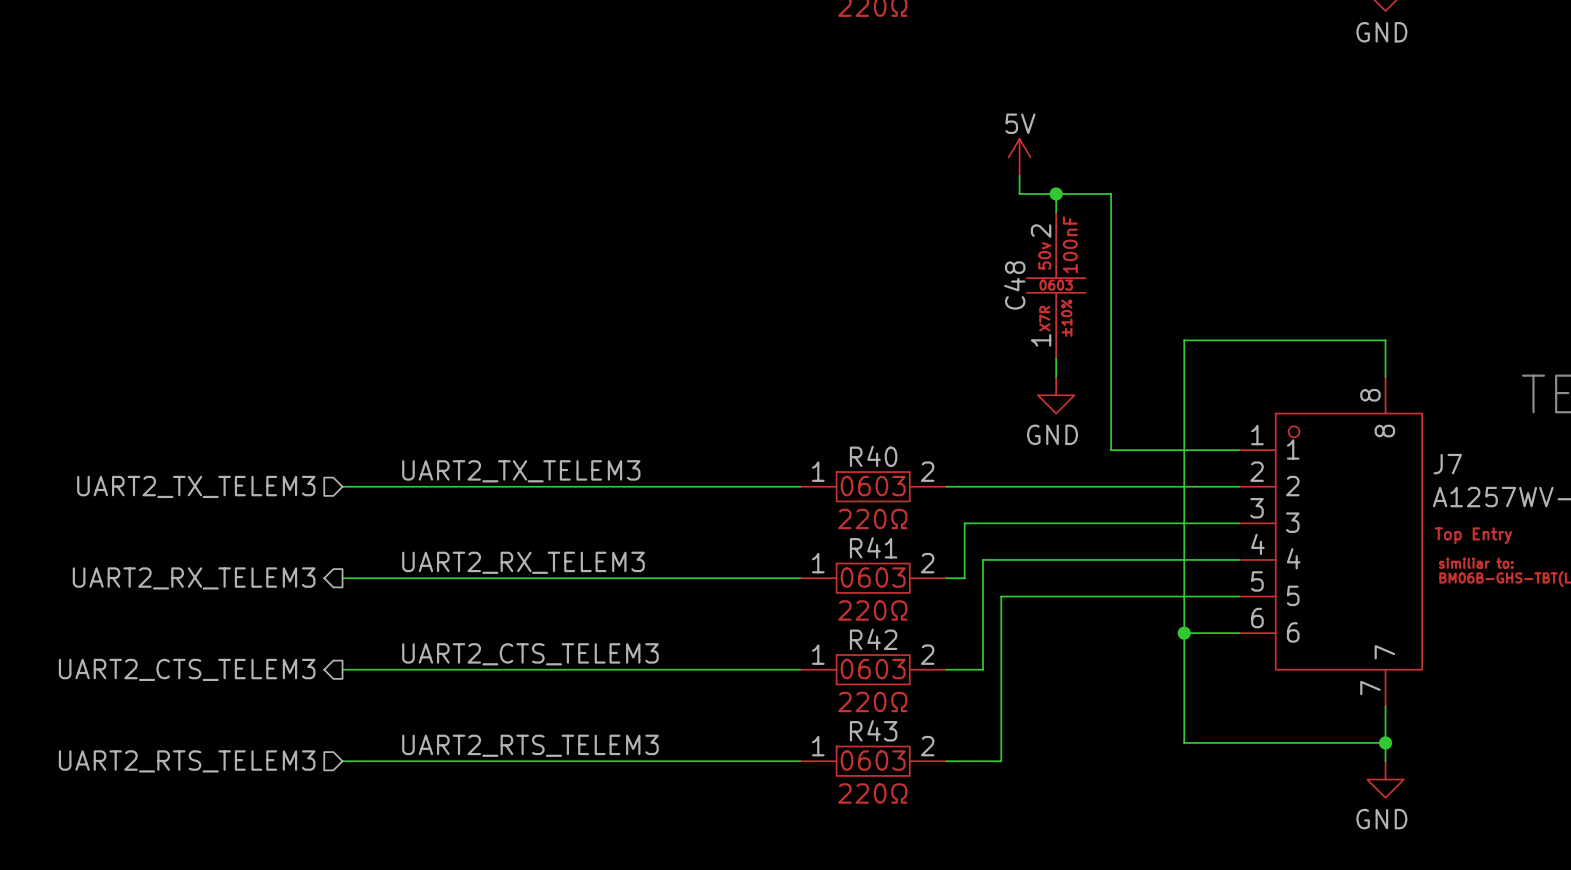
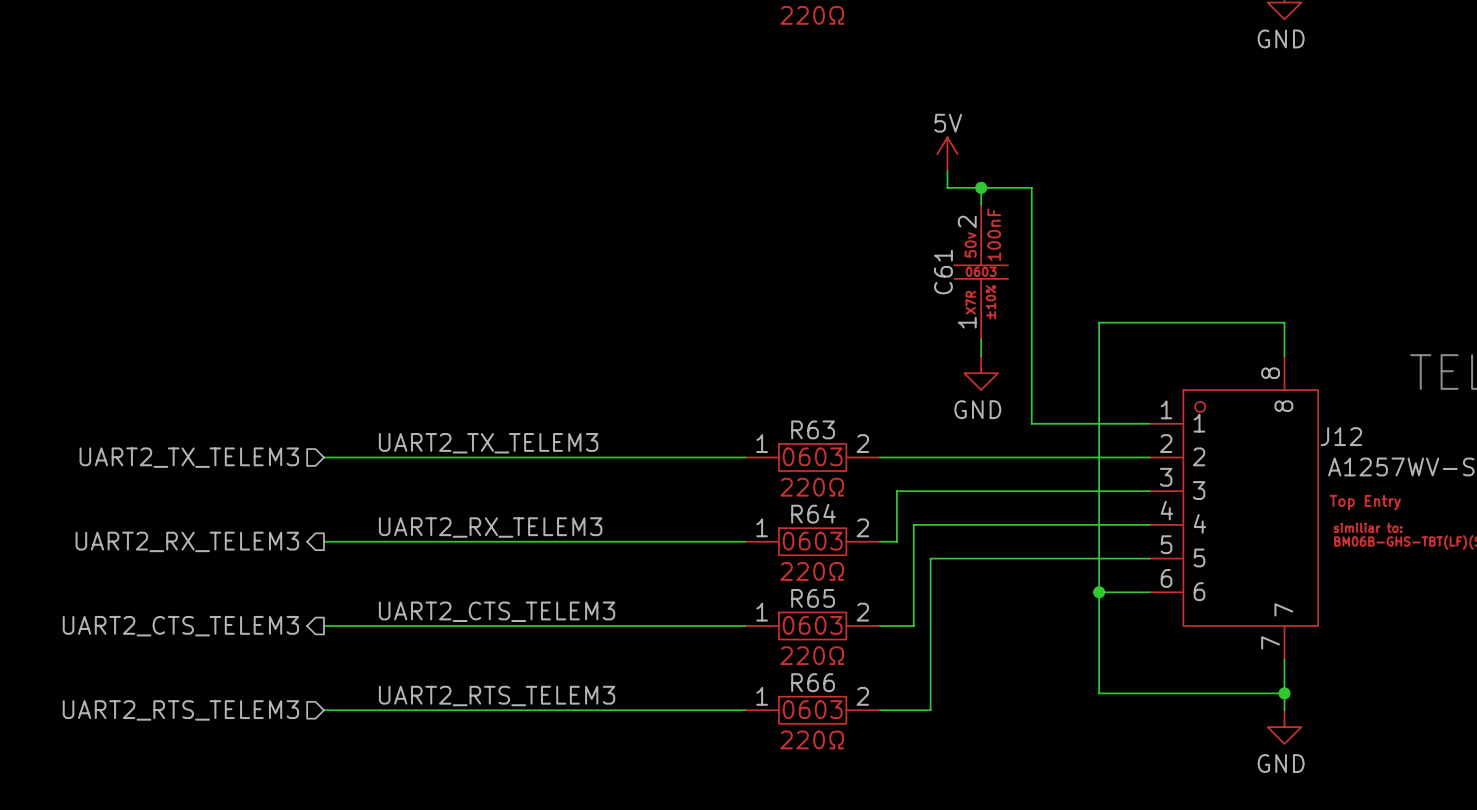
C48 name: C48 (1014, 285) -> C61 (943, 272)
R40 name: R40 (873, 456) -> R63 (813, 429)
J7 name: J7 (1447, 464) -> J12 (1341, 436)
R41 name: R41 (873, 547) -> R64 (813, 513)
R42 name: R42 (873, 639) -> R65 (813, 598)
R43 name: R43 (873, 730) -> R66 (813, 682)

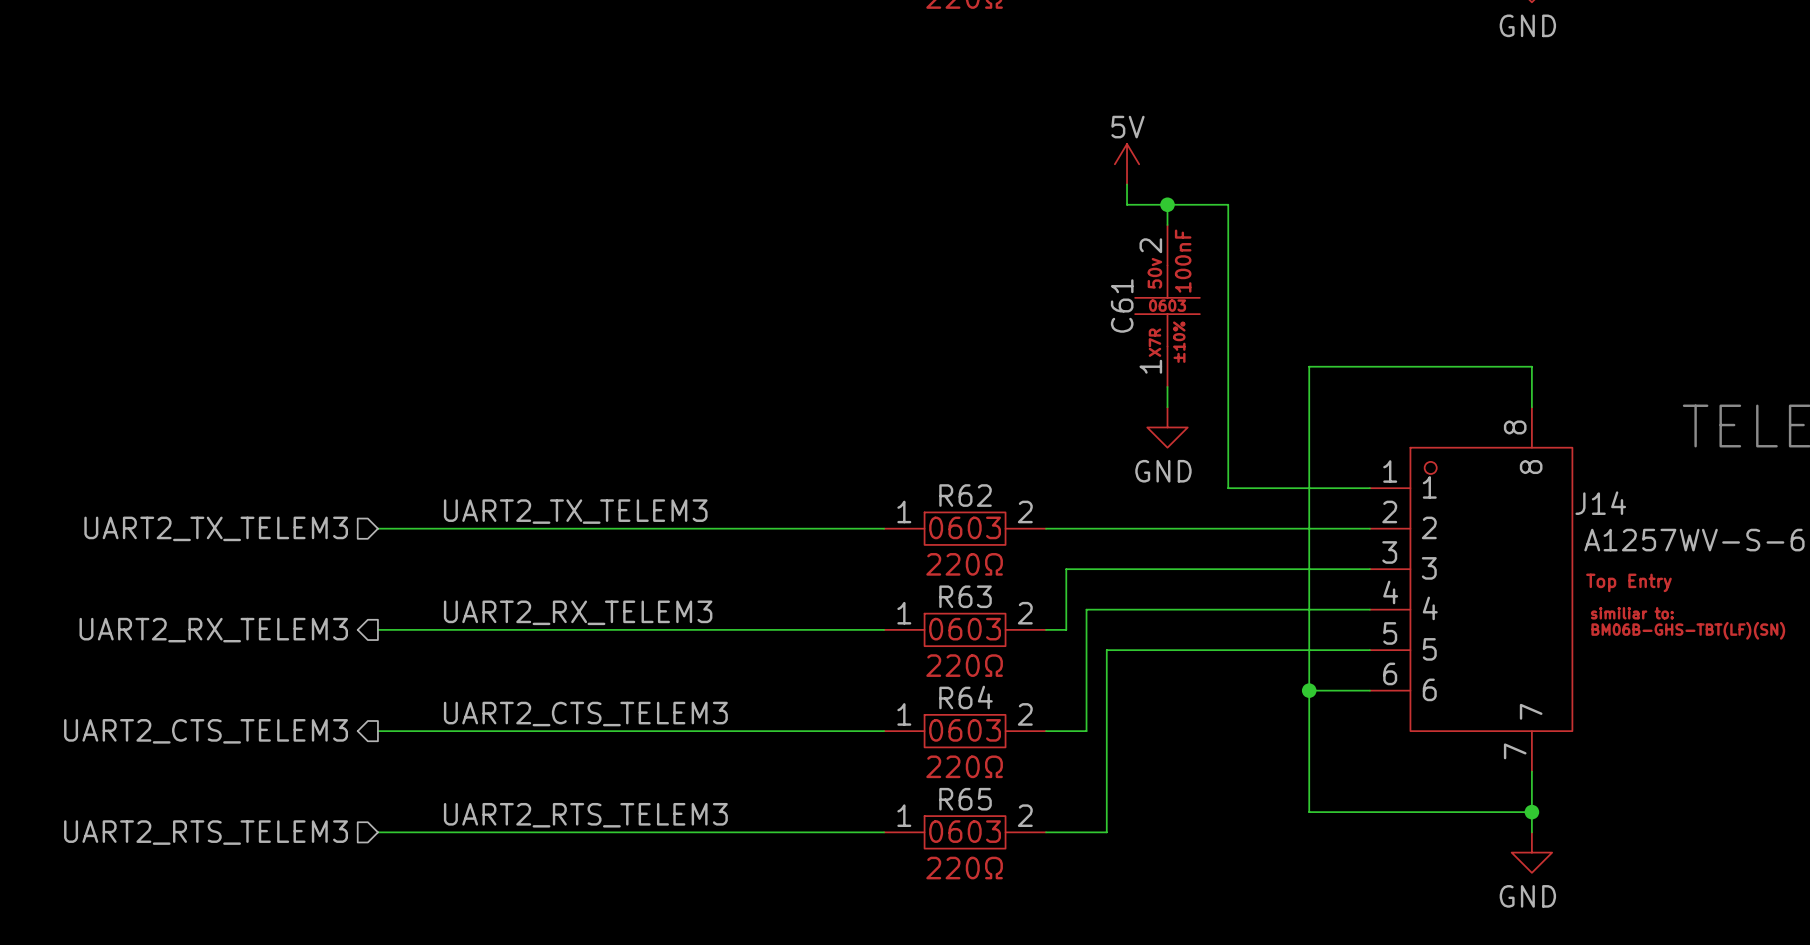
R63 name: R63 (813, 429) -> R62 (965, 495)
J12 name: J12 (1341, 436) -> J14 (1600, 503)
R64 name: R64 (813, 513) -> R63 (965, 596)
R65 name: R65 (813, 598) -> R64 (966, 697)
R66 name: R66 (813, 682) -> R65 (965, 799)

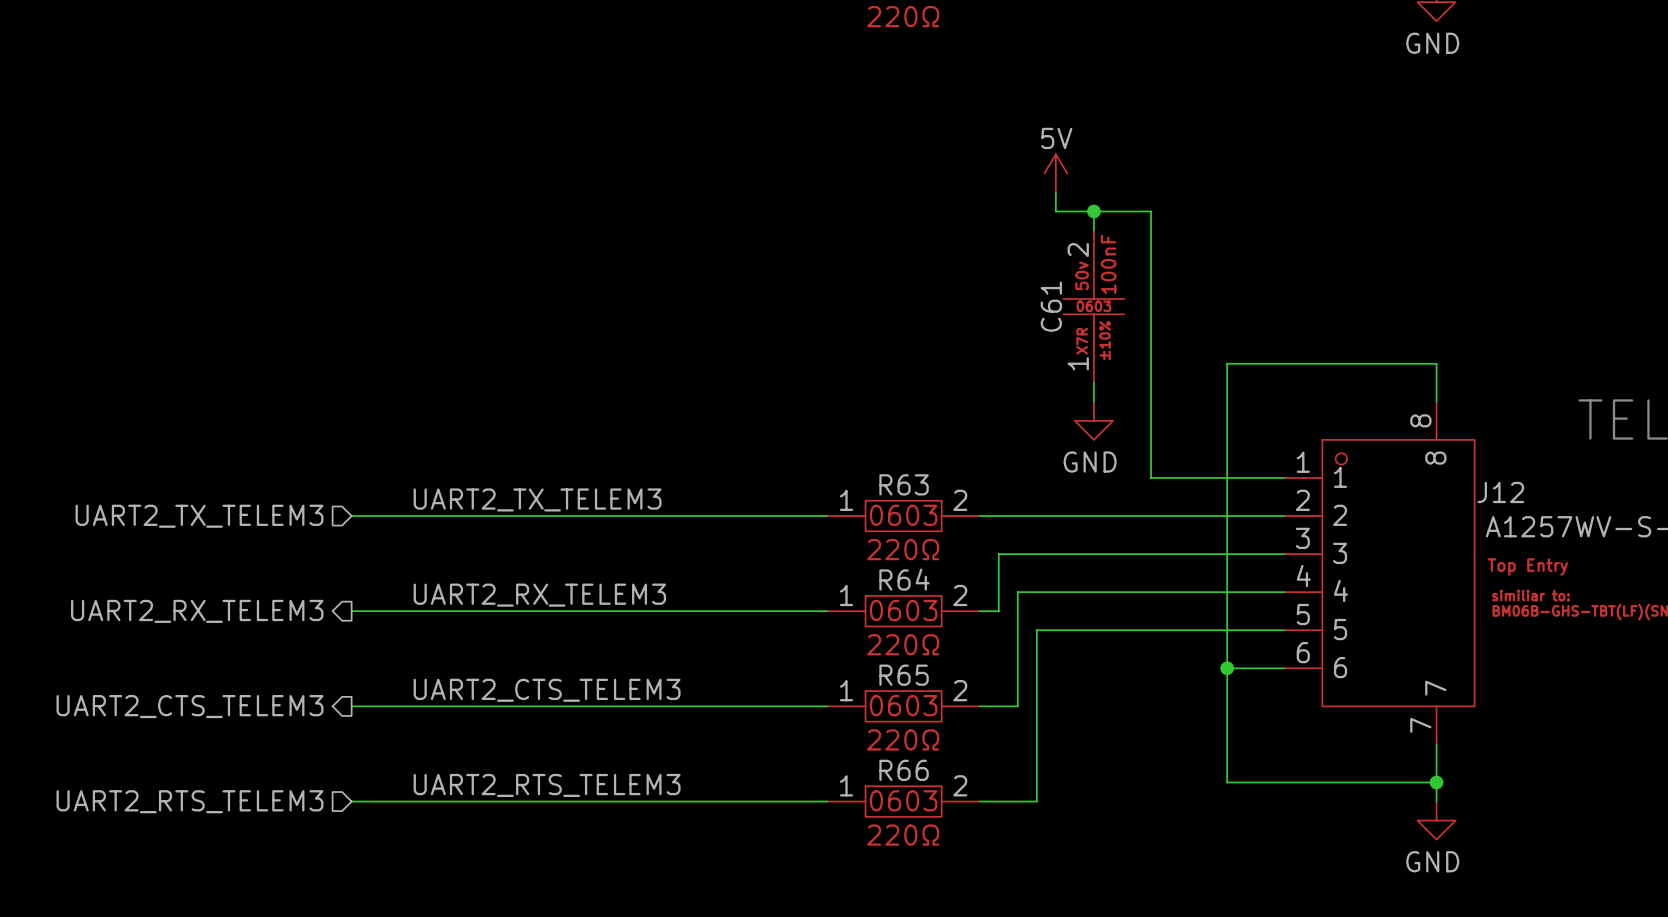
R62 name: R62 (965, 495) -> R63 (904, 484)
J14 name: J14 (1600, 503) -> J12 (1500, 492)
R63 name: R63 (965, 596) -> R64 (904, 579)
R64 name: R64 (966, 697) -> R65 (904, 675)
R65 name: R65 (965, 799) -> R66 (904, 770)

